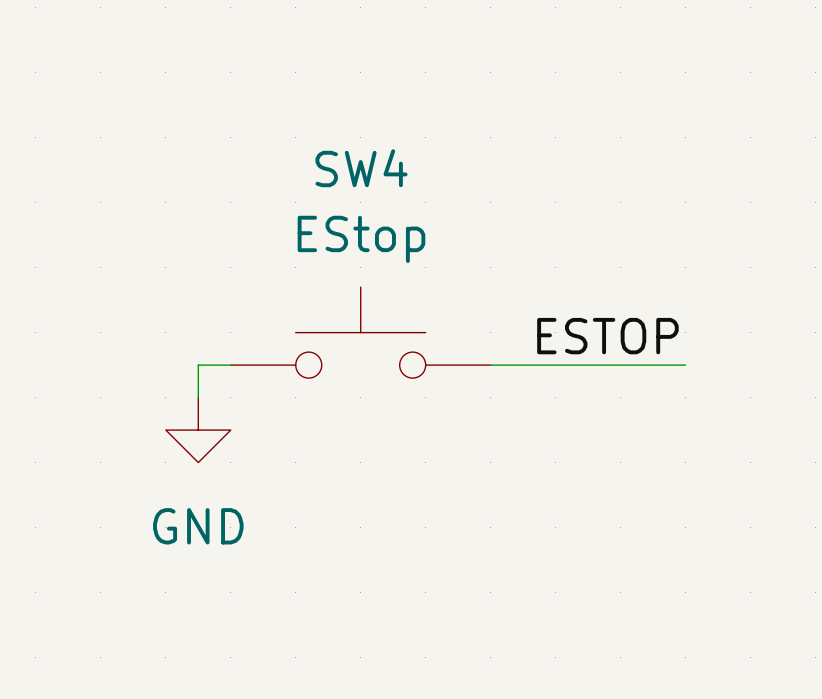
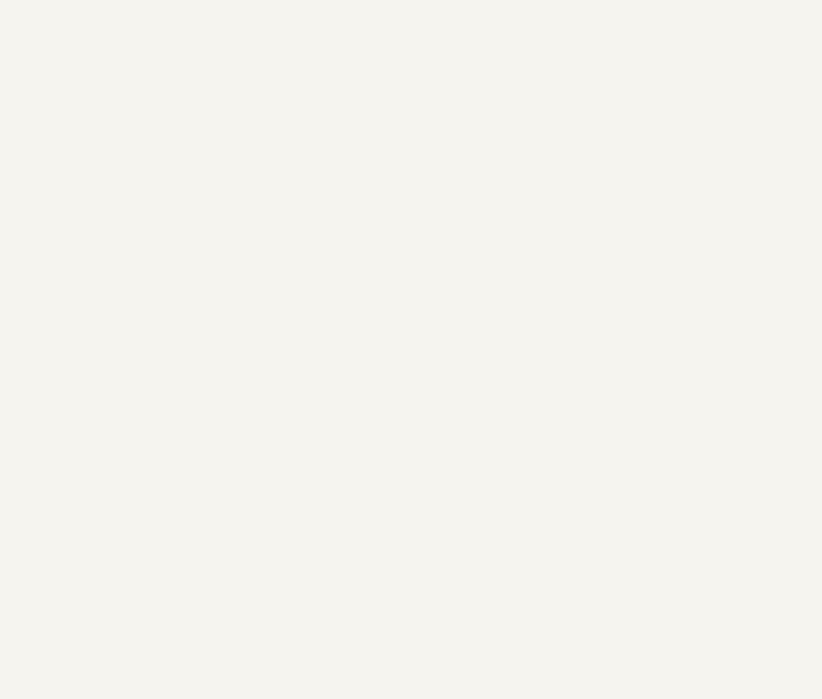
SW4: EStop (360, 332) -> none
label: ESTOP (607, 336) -> none
wire: (230, 365) (198, 365) (198, 397) -> none
wire: (490, 365) (685, 365) -> none
power symbol: GND (198, 430) -> none

